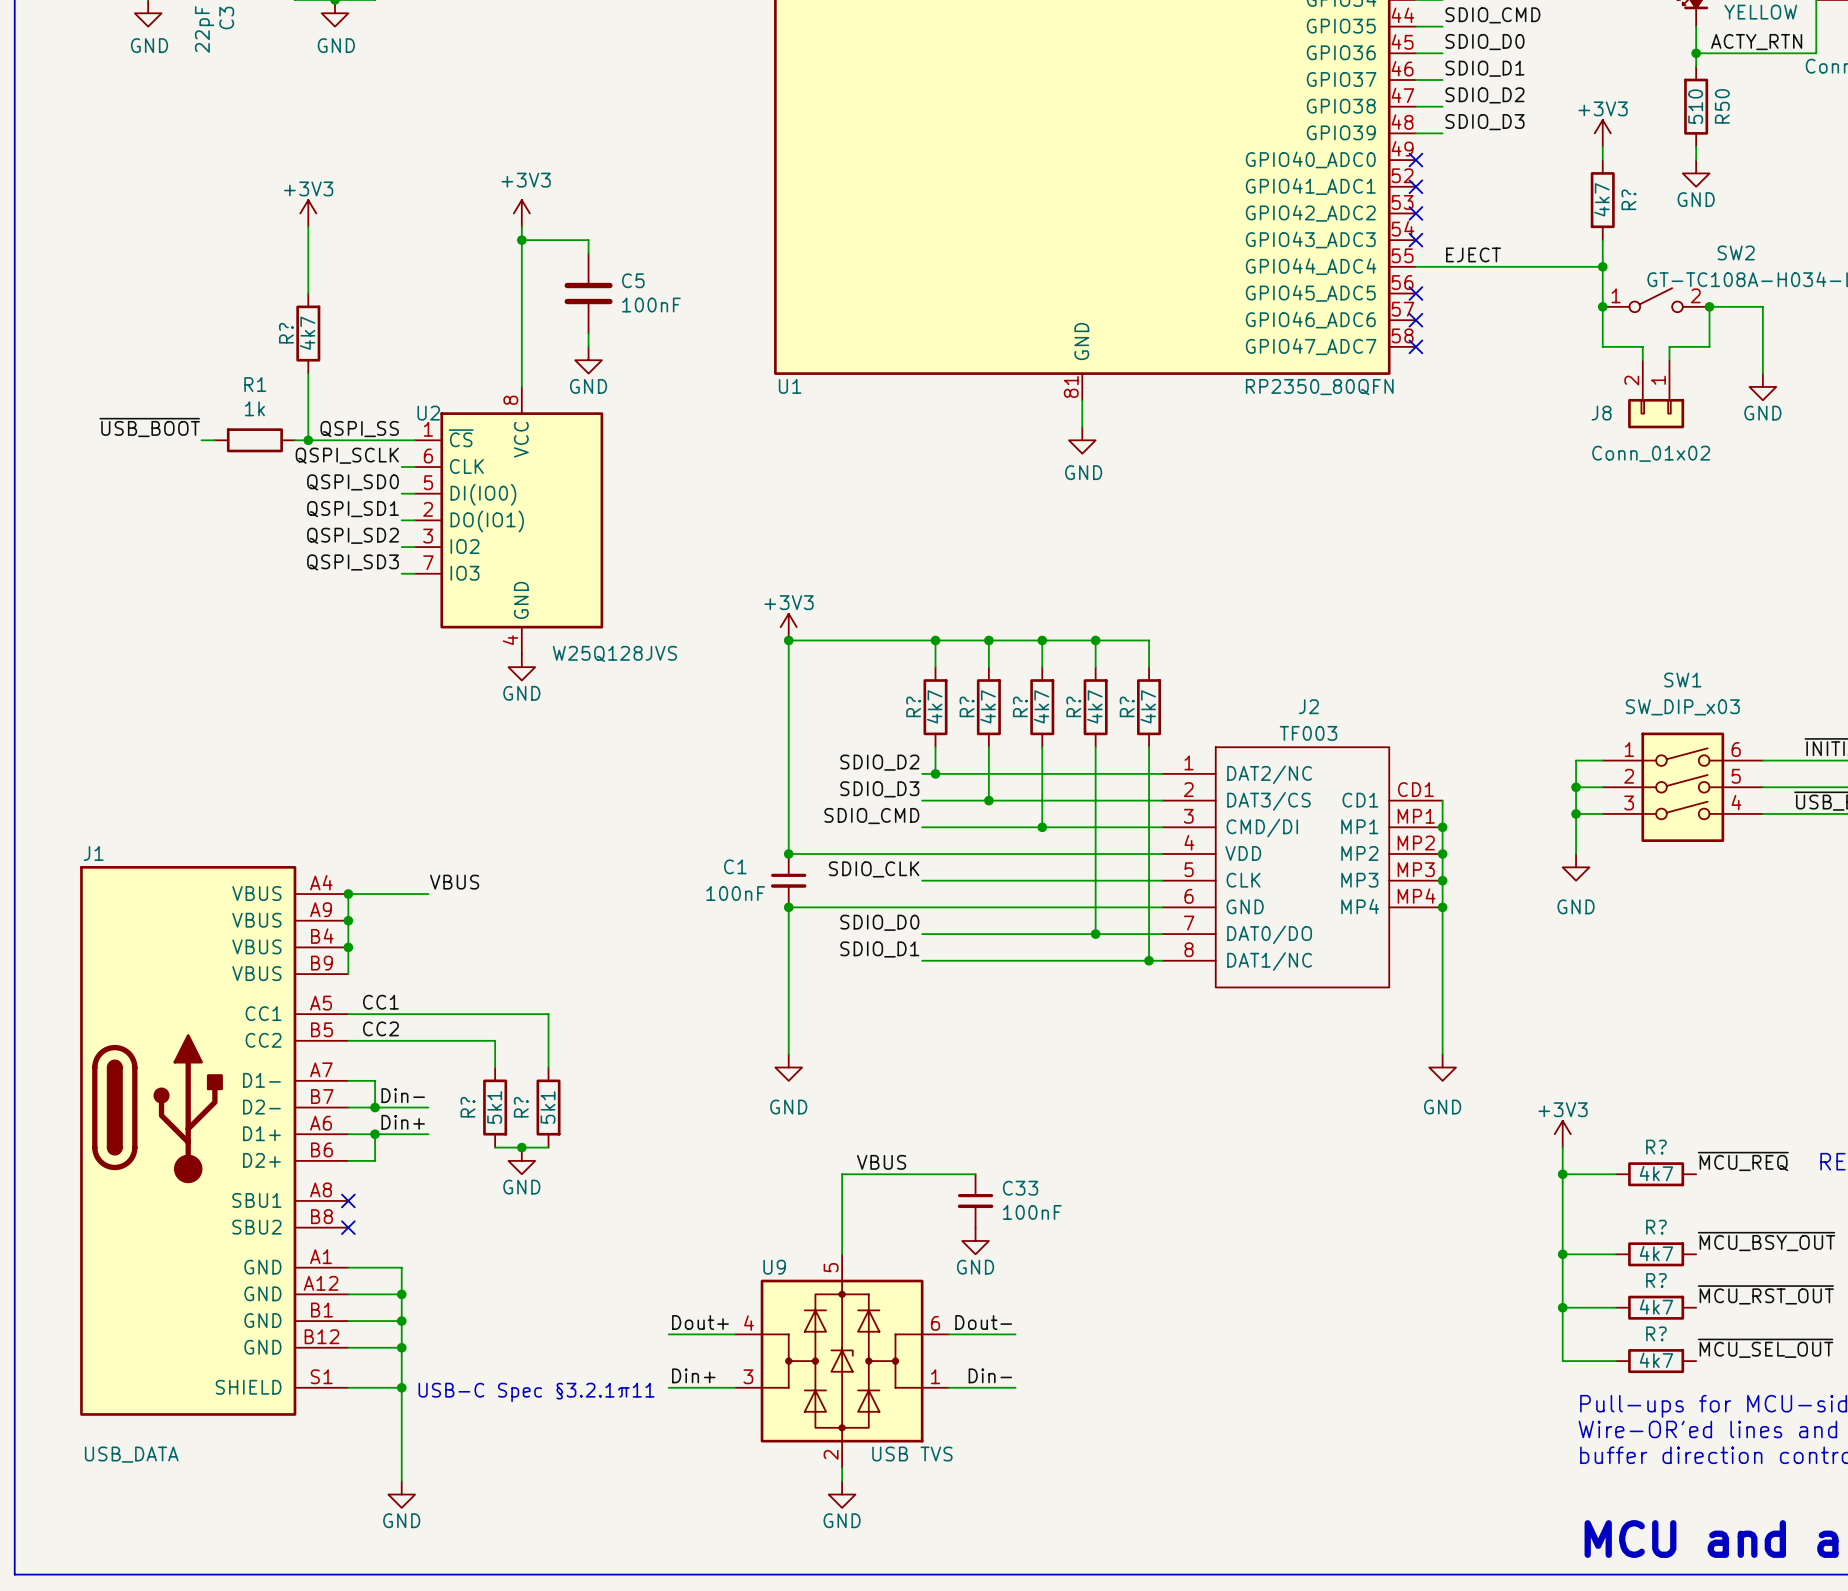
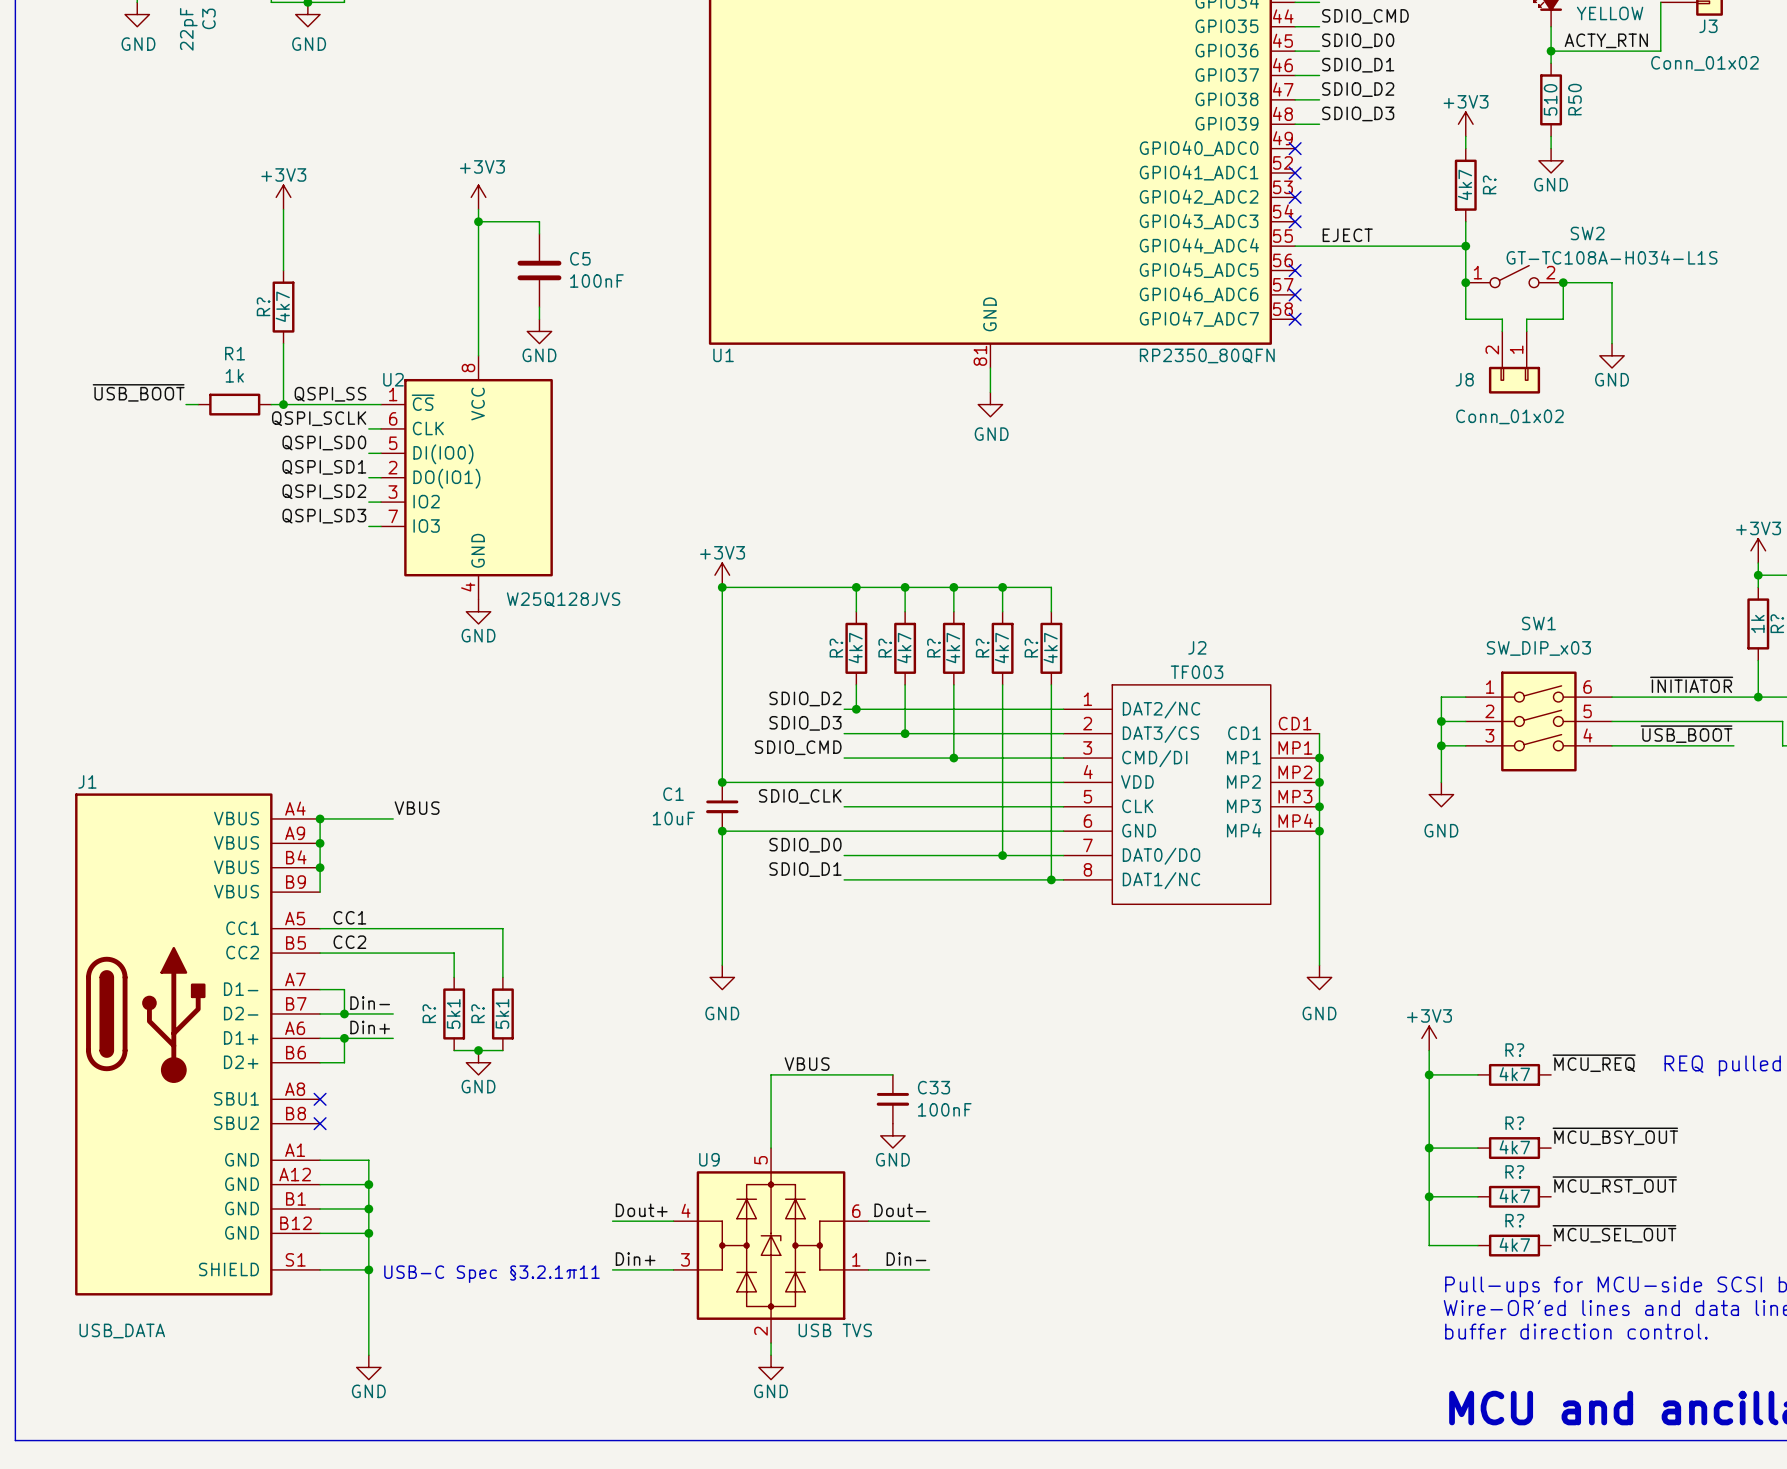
C1 value: 100nF (735, 893) -> 10uF (673, 818)

